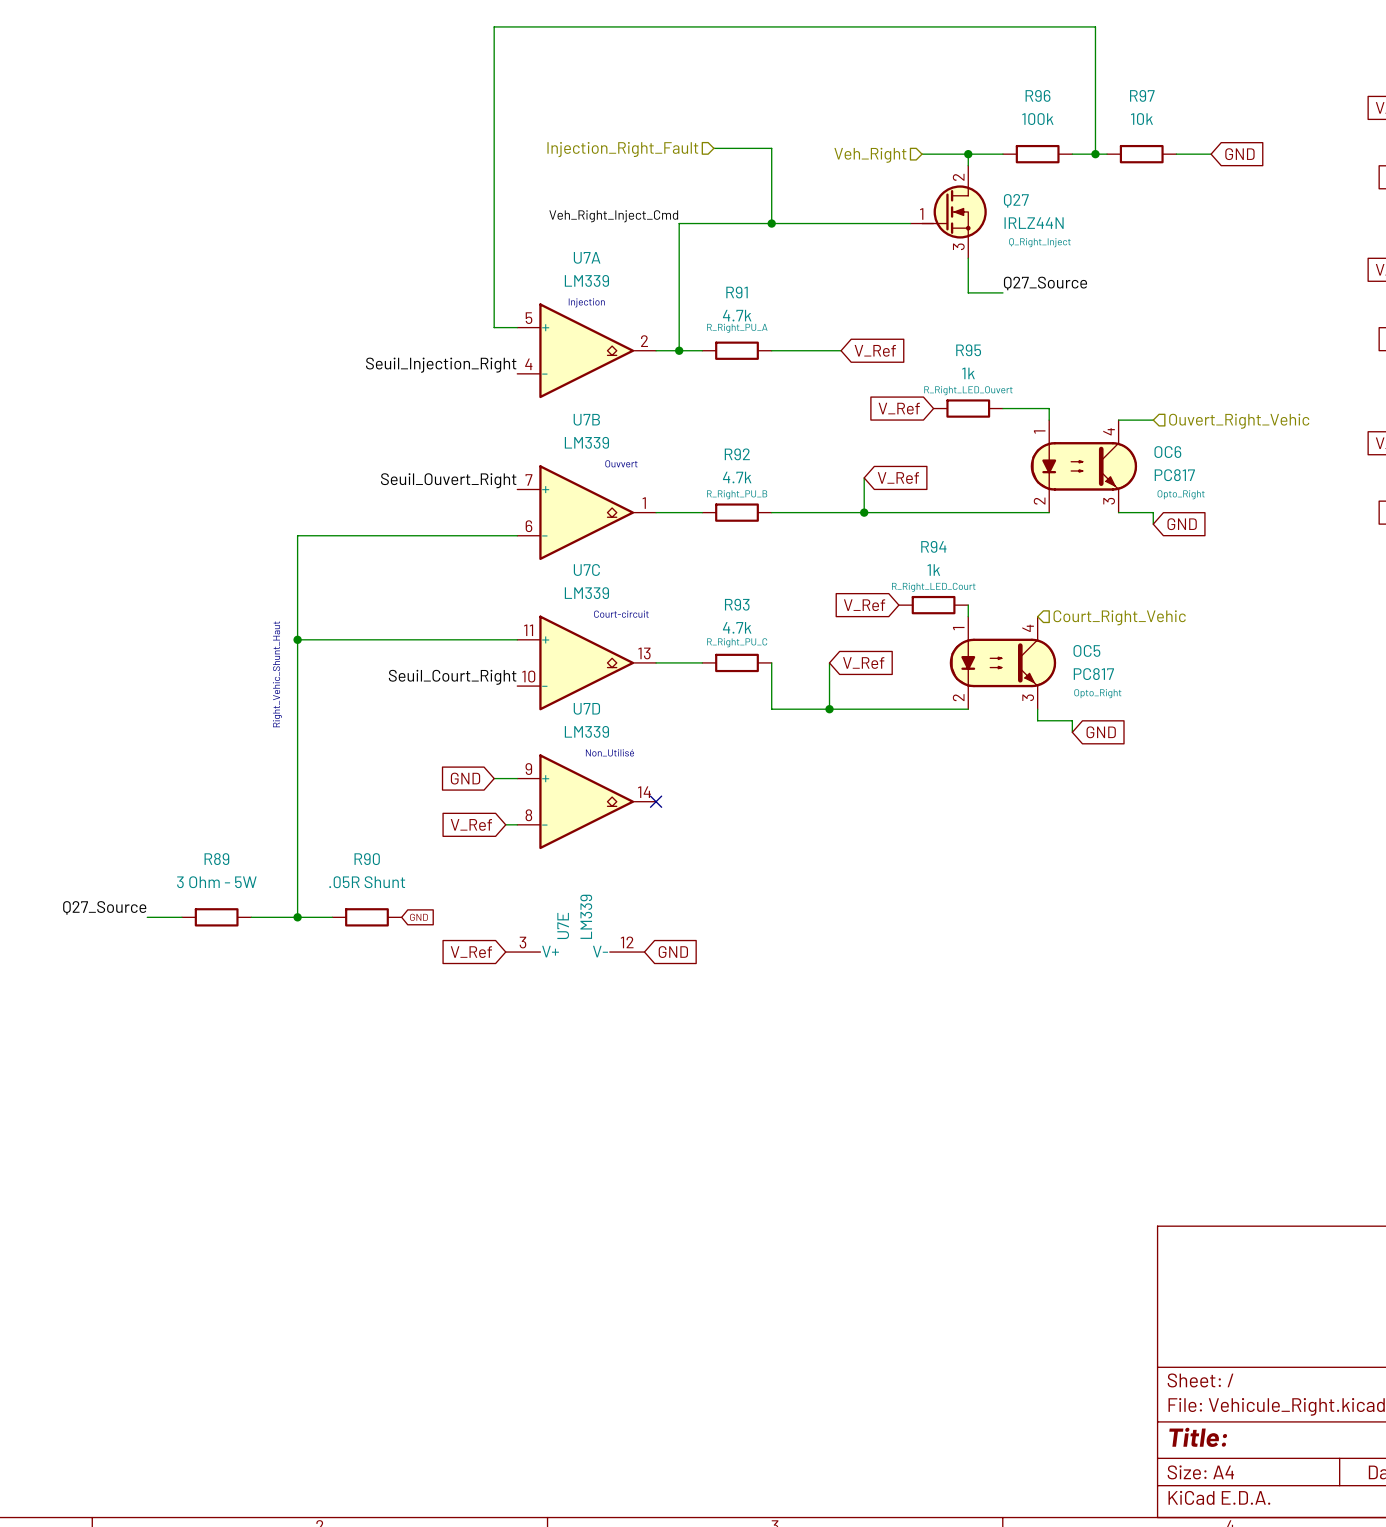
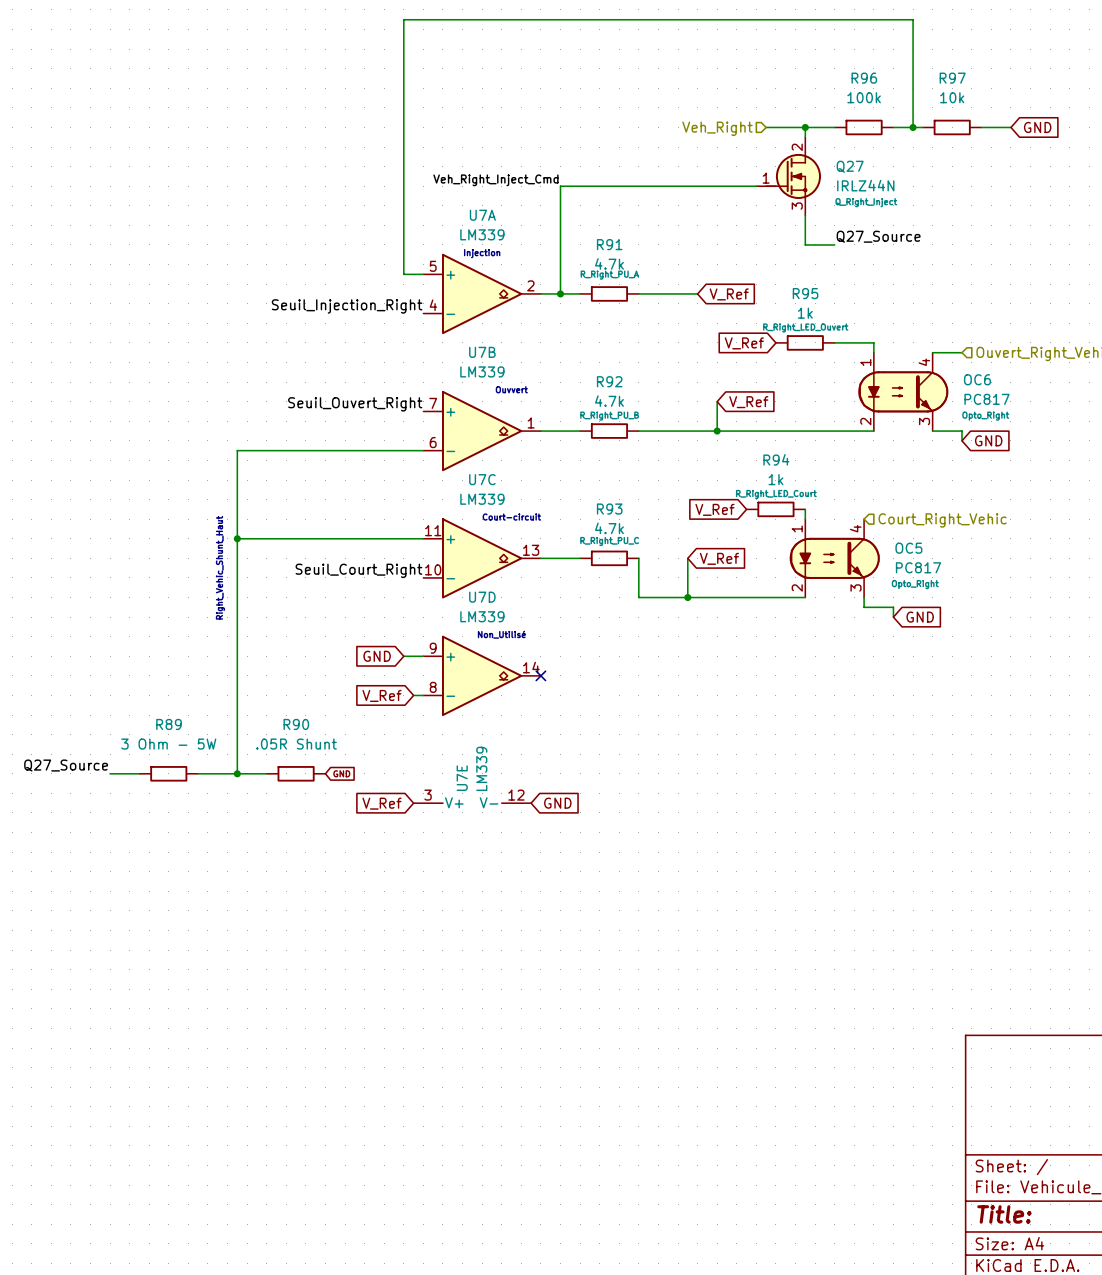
wire: (713, 148) (771, 148) (771, 223) -> none
hierarchical label: Injection_Right_Fault (622, 149) -> none
junction: (771, 223) -> none

